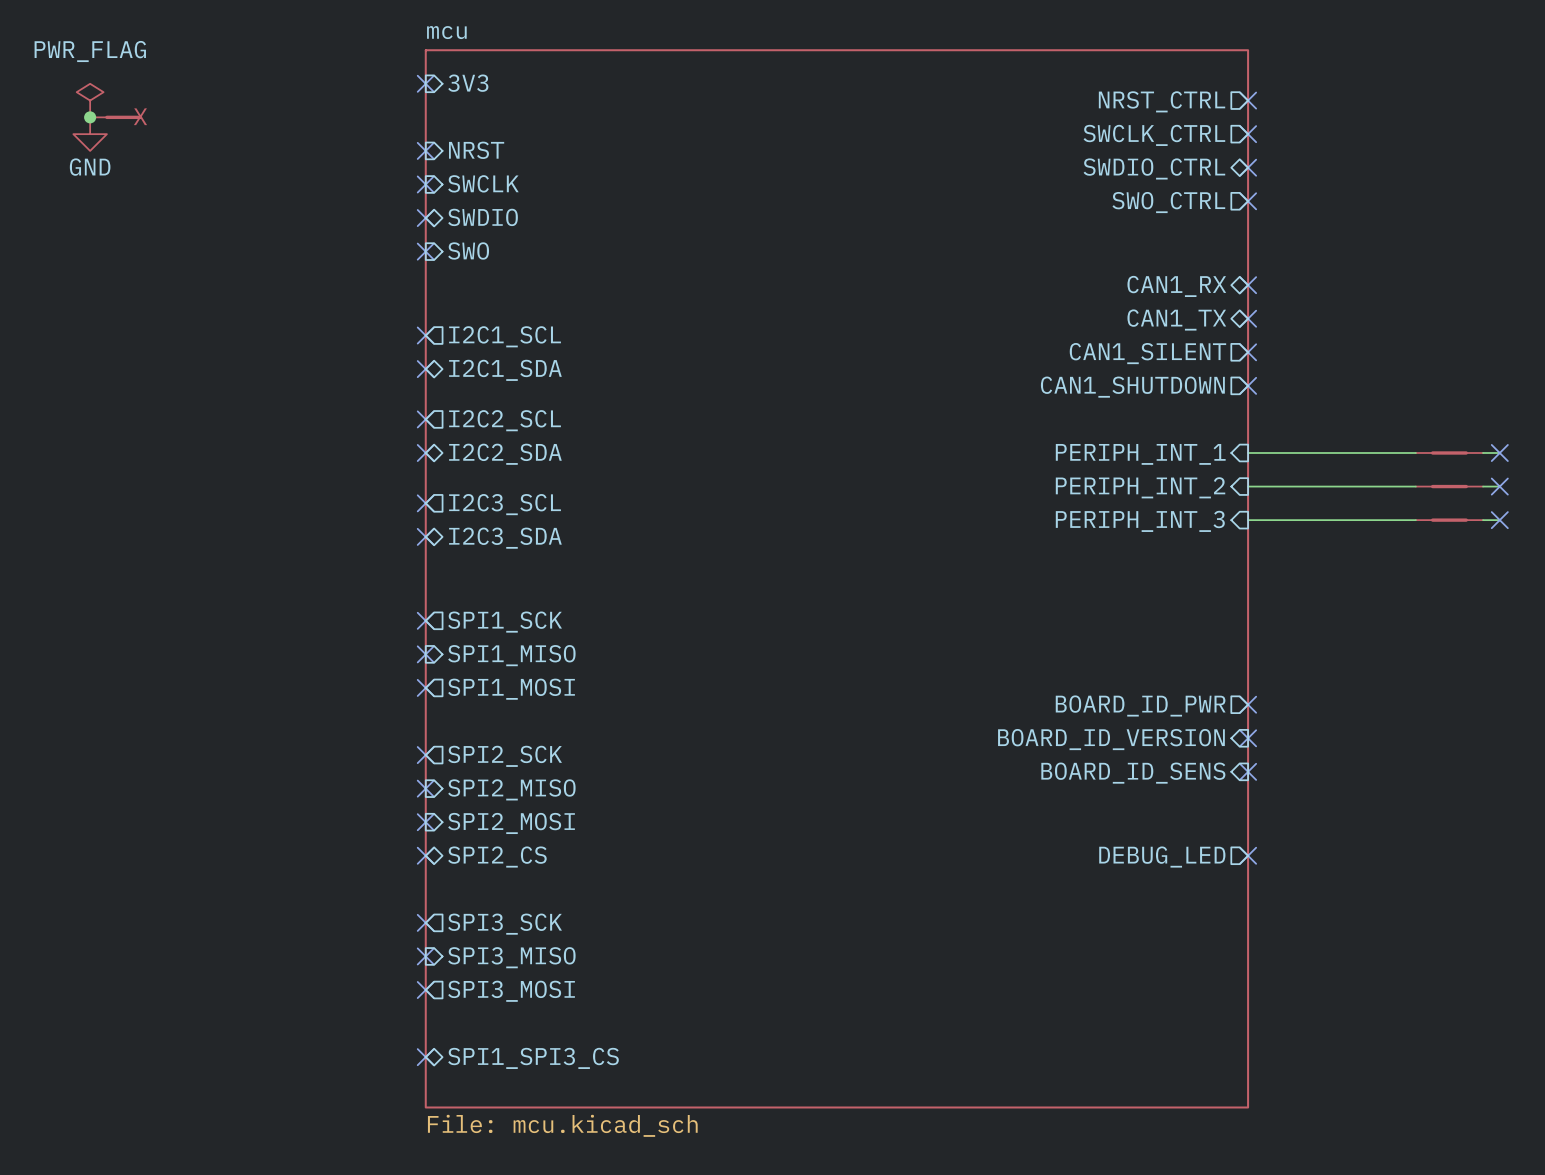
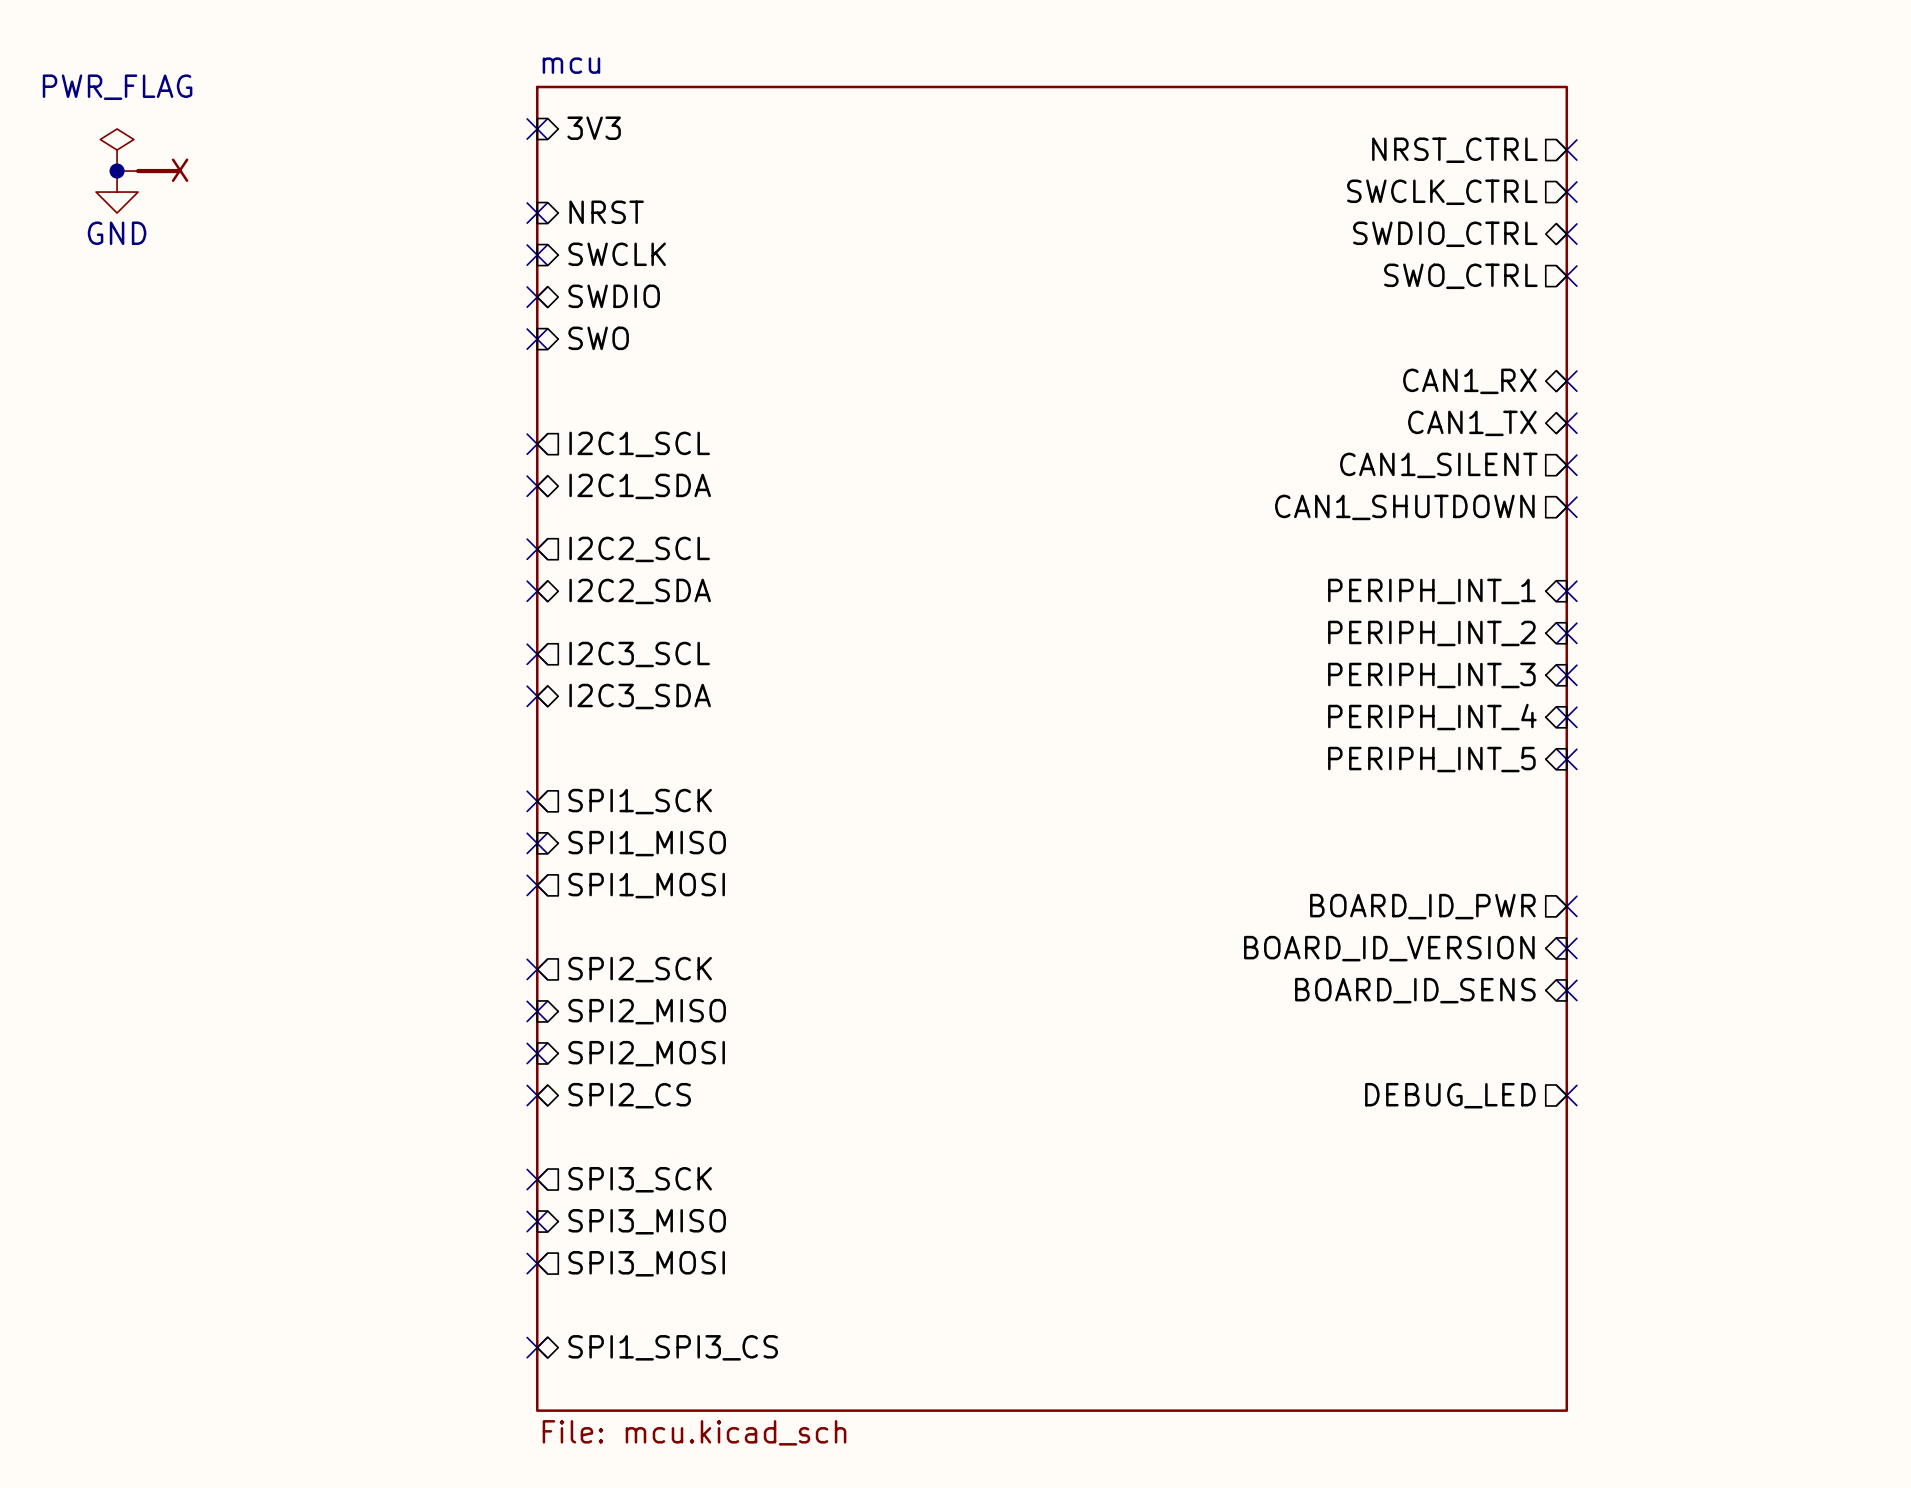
wire: (1248, 452) (1415, 452) -> none
no-connect mark: none -> (1566, 591)
part: (1449, 452) -> none
wire: (1483, 452) (1499, 452) -> none
no-connect mark: (1499, 452) -> none
wire: (1248, 486) (1415, 486) -> none
no-connect mark: none -> (1566, 633)
part: (1449, 486) -> none
wire: (1483, 486) (1499, 486) -> none
no-connect mark: (1499, 486) -> none
wire: (1248, 520) (1415, 520) -> none
no-connect mark: none -> (1566, 675)
part: (1449, 520) -> none
wire: (1483, 520) (1499, 520) -> none
no-connect mark: (1499, 520) -> none
no-connect mark: none -> (1566, 717)
sheet pin: none -> PERIPH_INT_4 (1432, 717)
no-connect mark: none -> (1566, 759)
sheet pin: none -> PERIPH_INT_5 (1431, 759)

